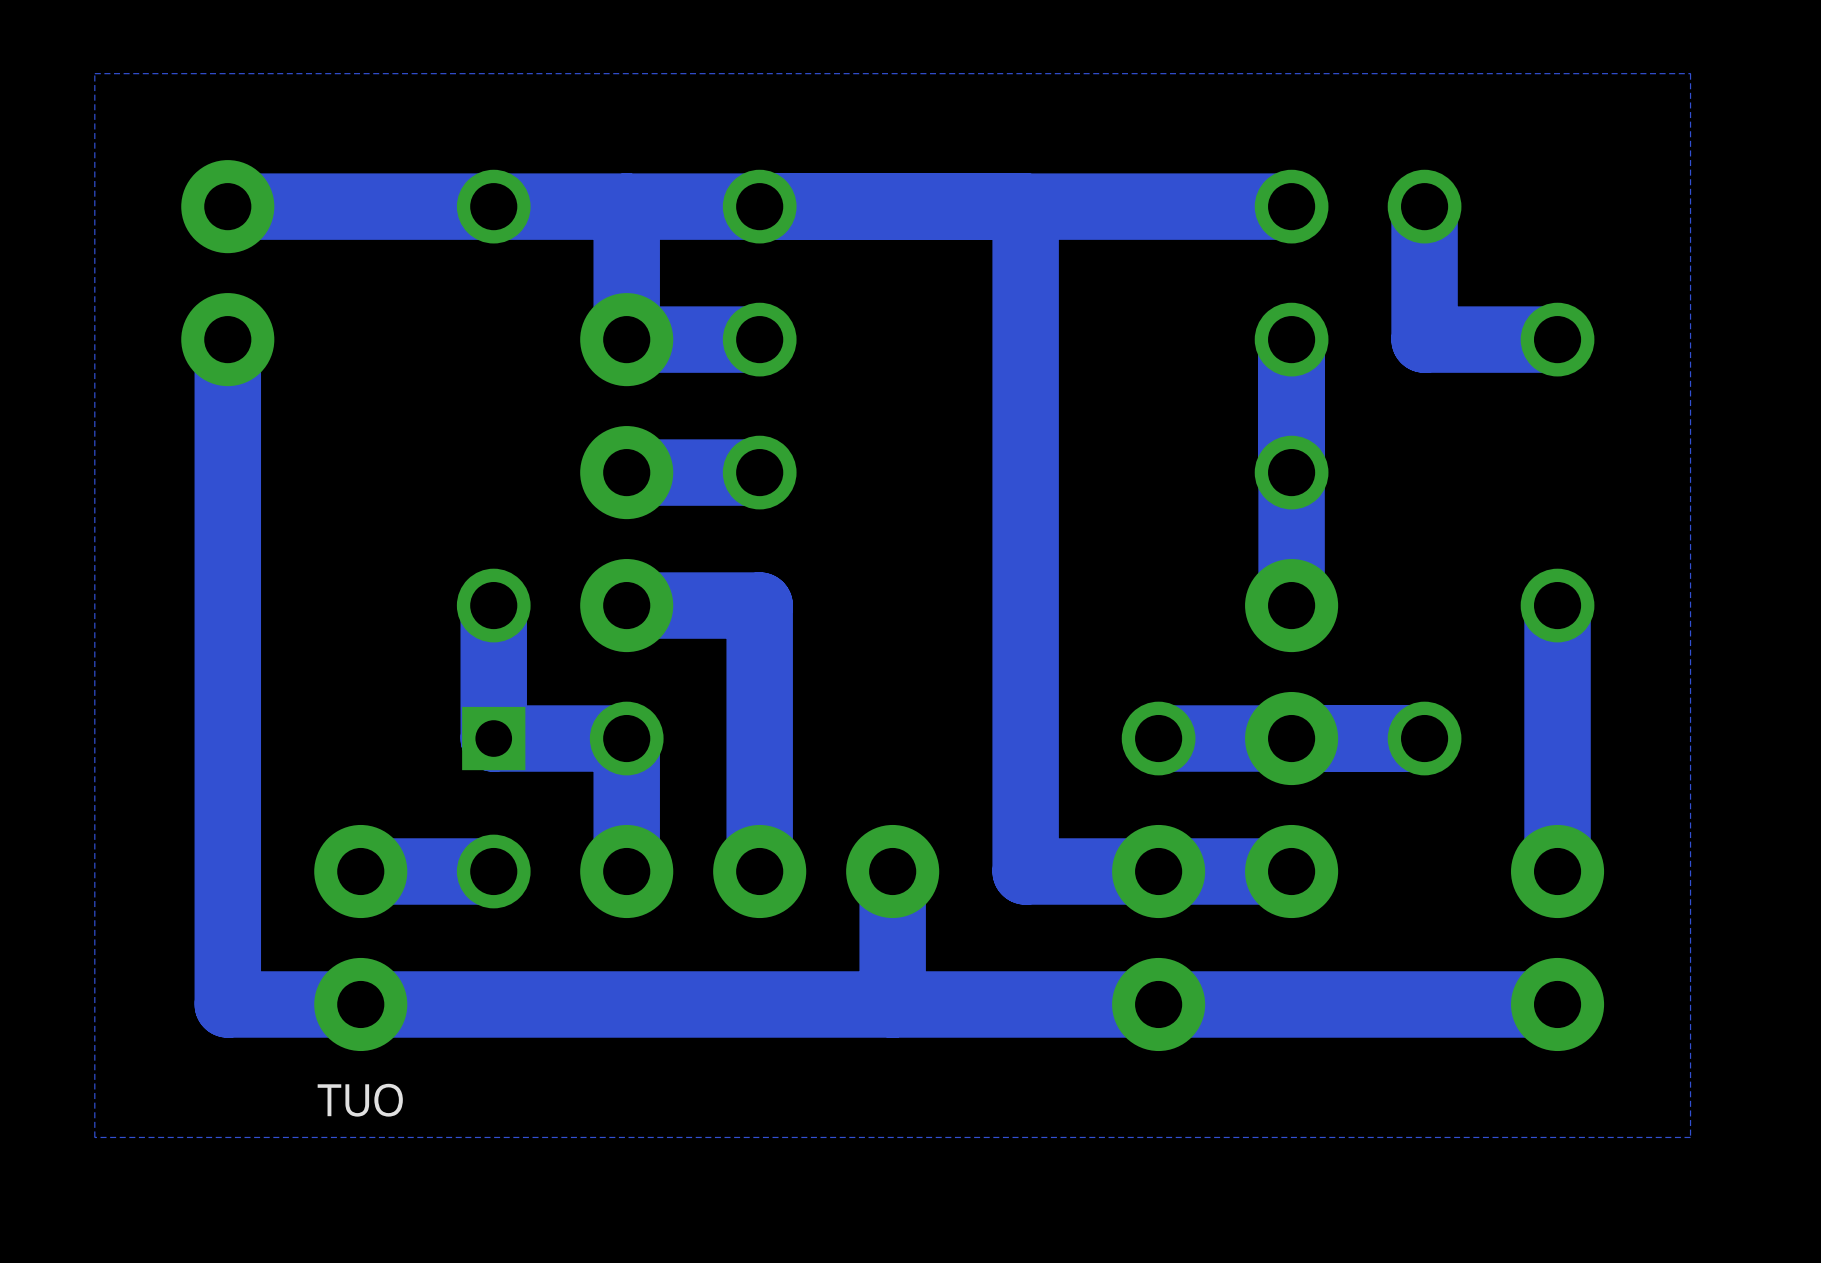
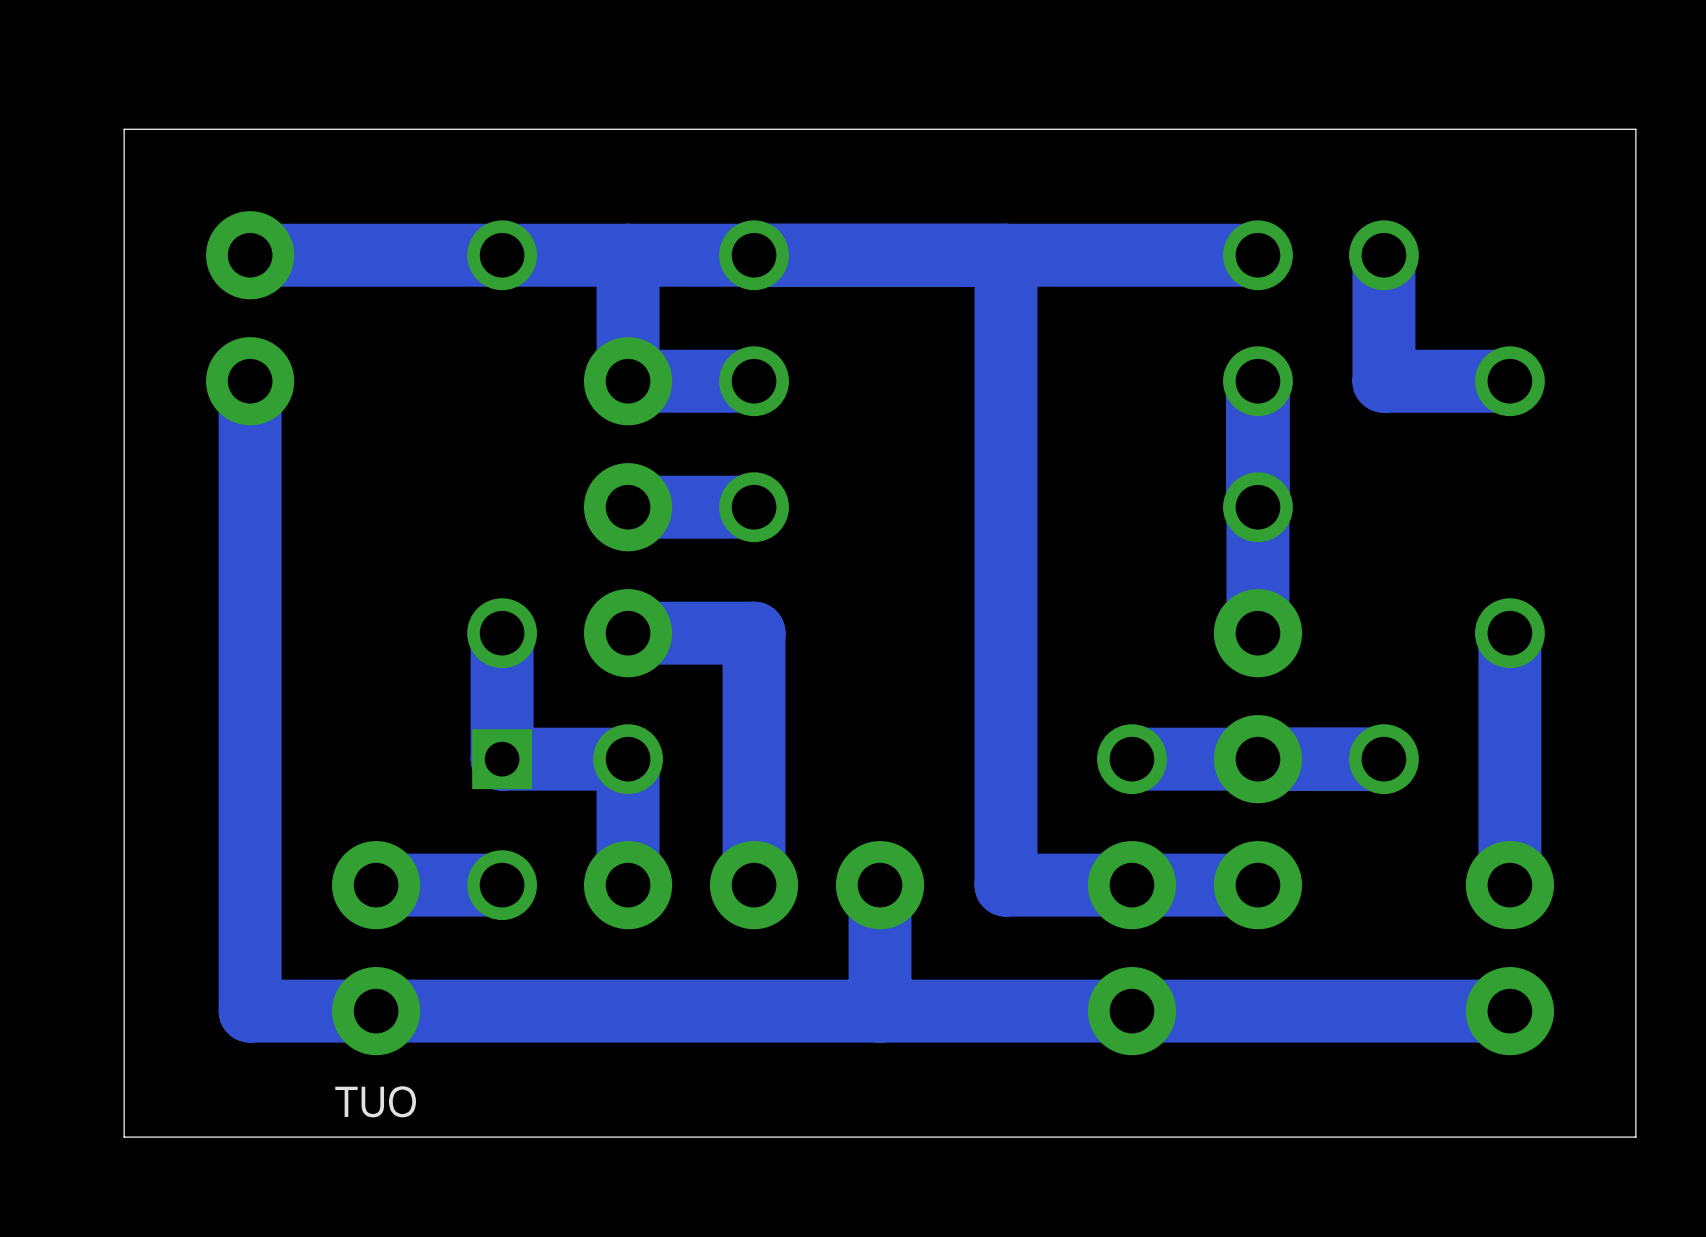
zone outline: (1690, 73) (1690, 1137) (94, 1137) (94, 73) (1690, 73) -> none
board edge: none -> (1635, 129) (124, 129) (124, 1137) (1635, 1137) (1635, 129)

